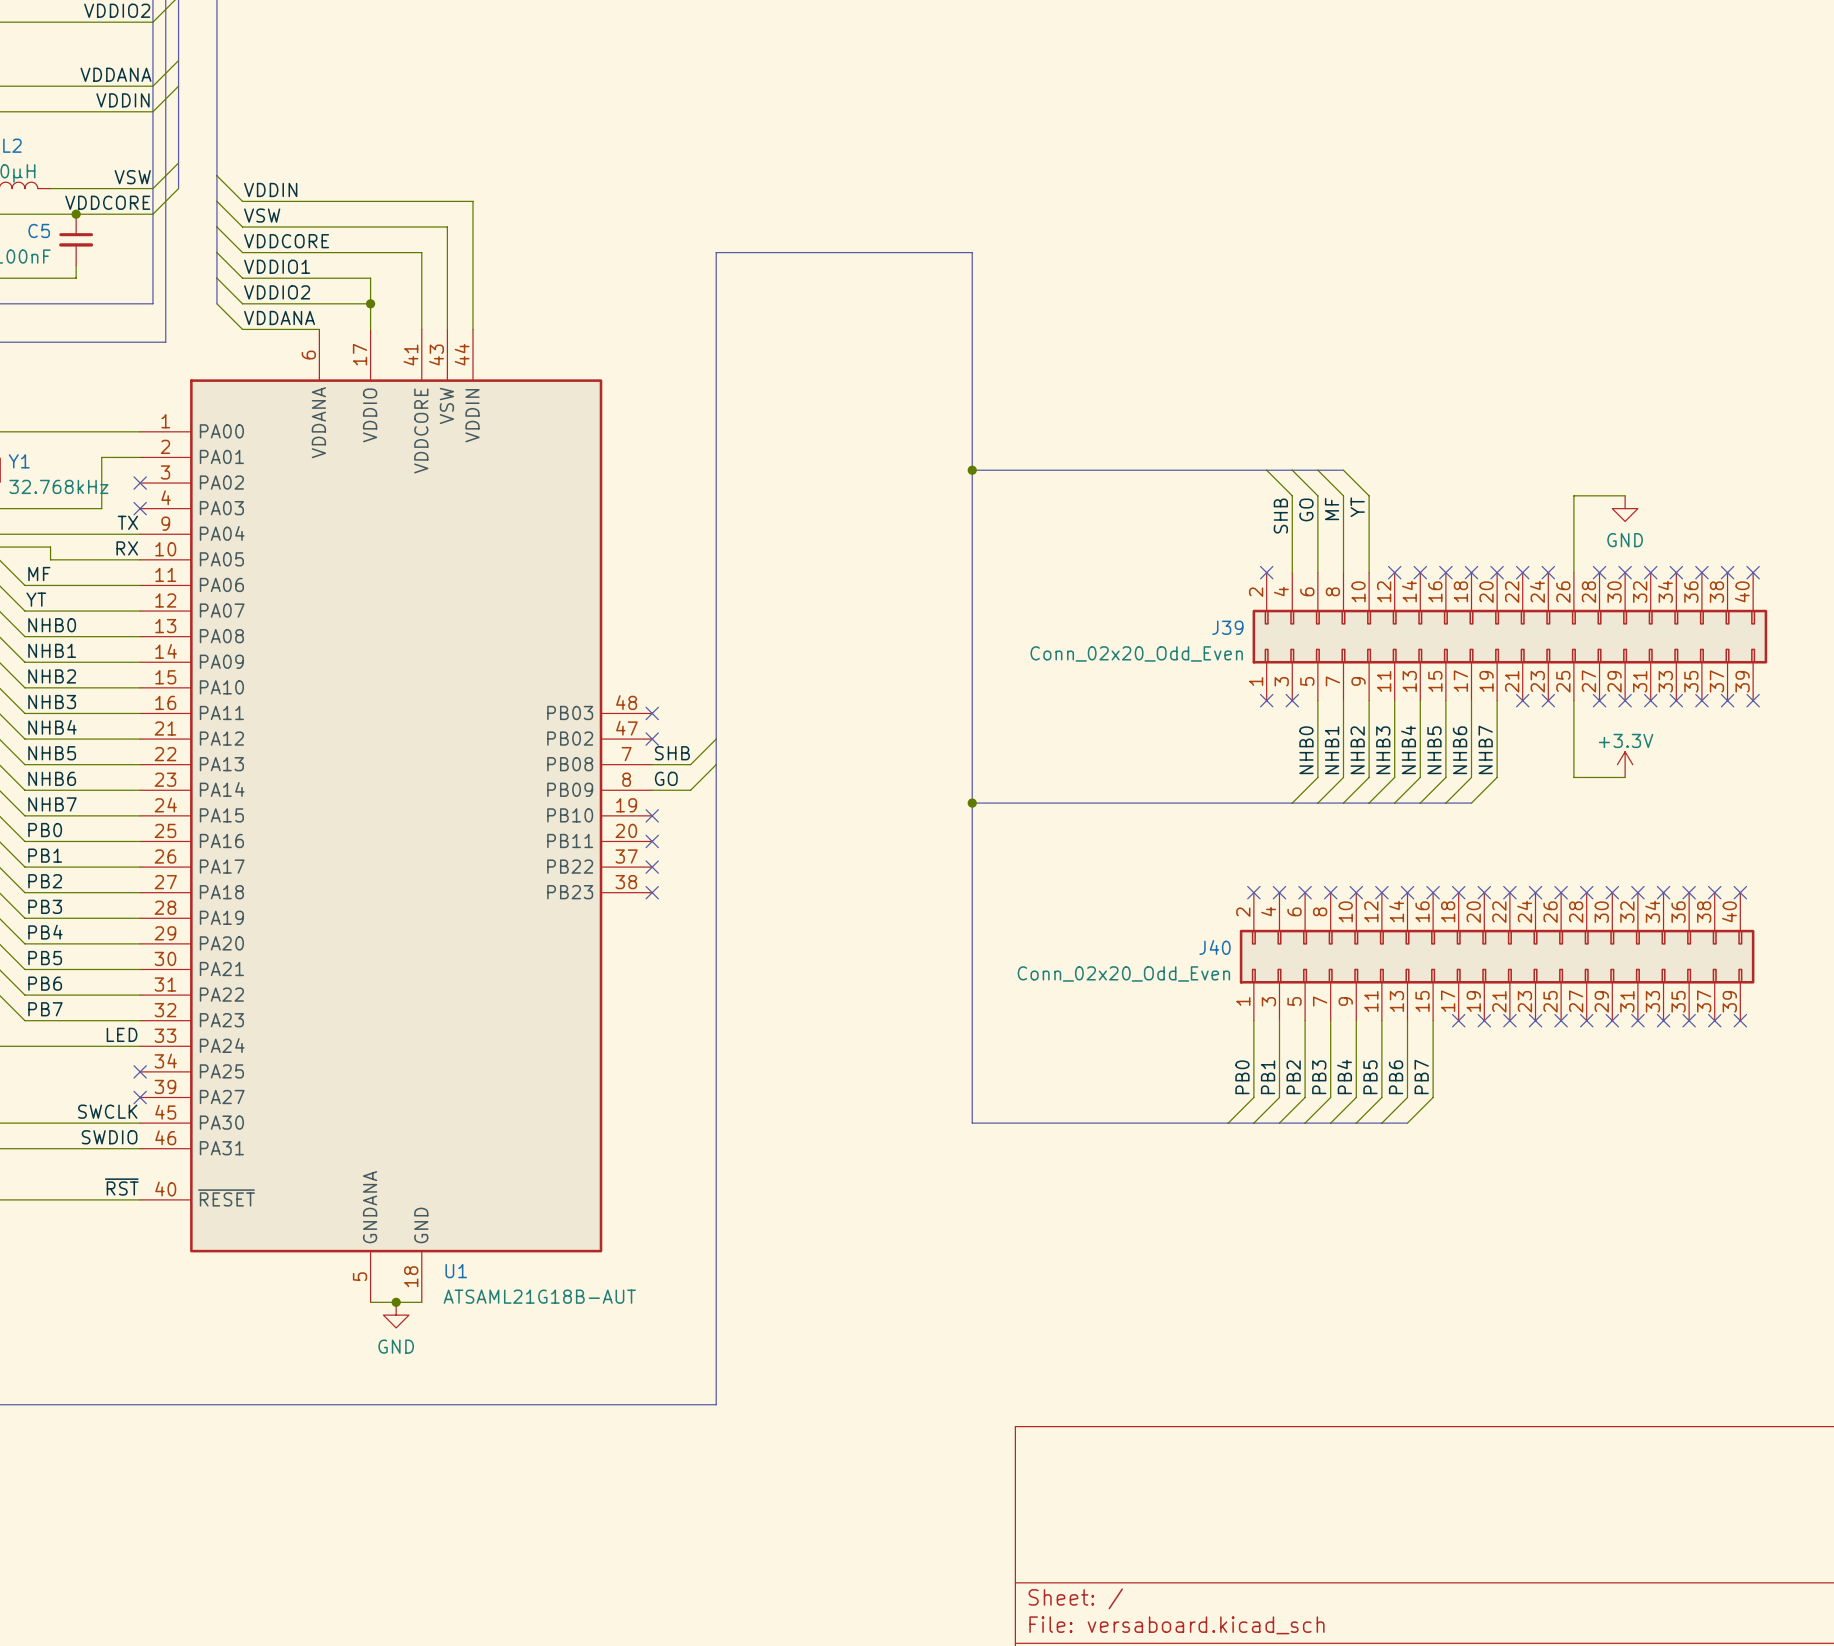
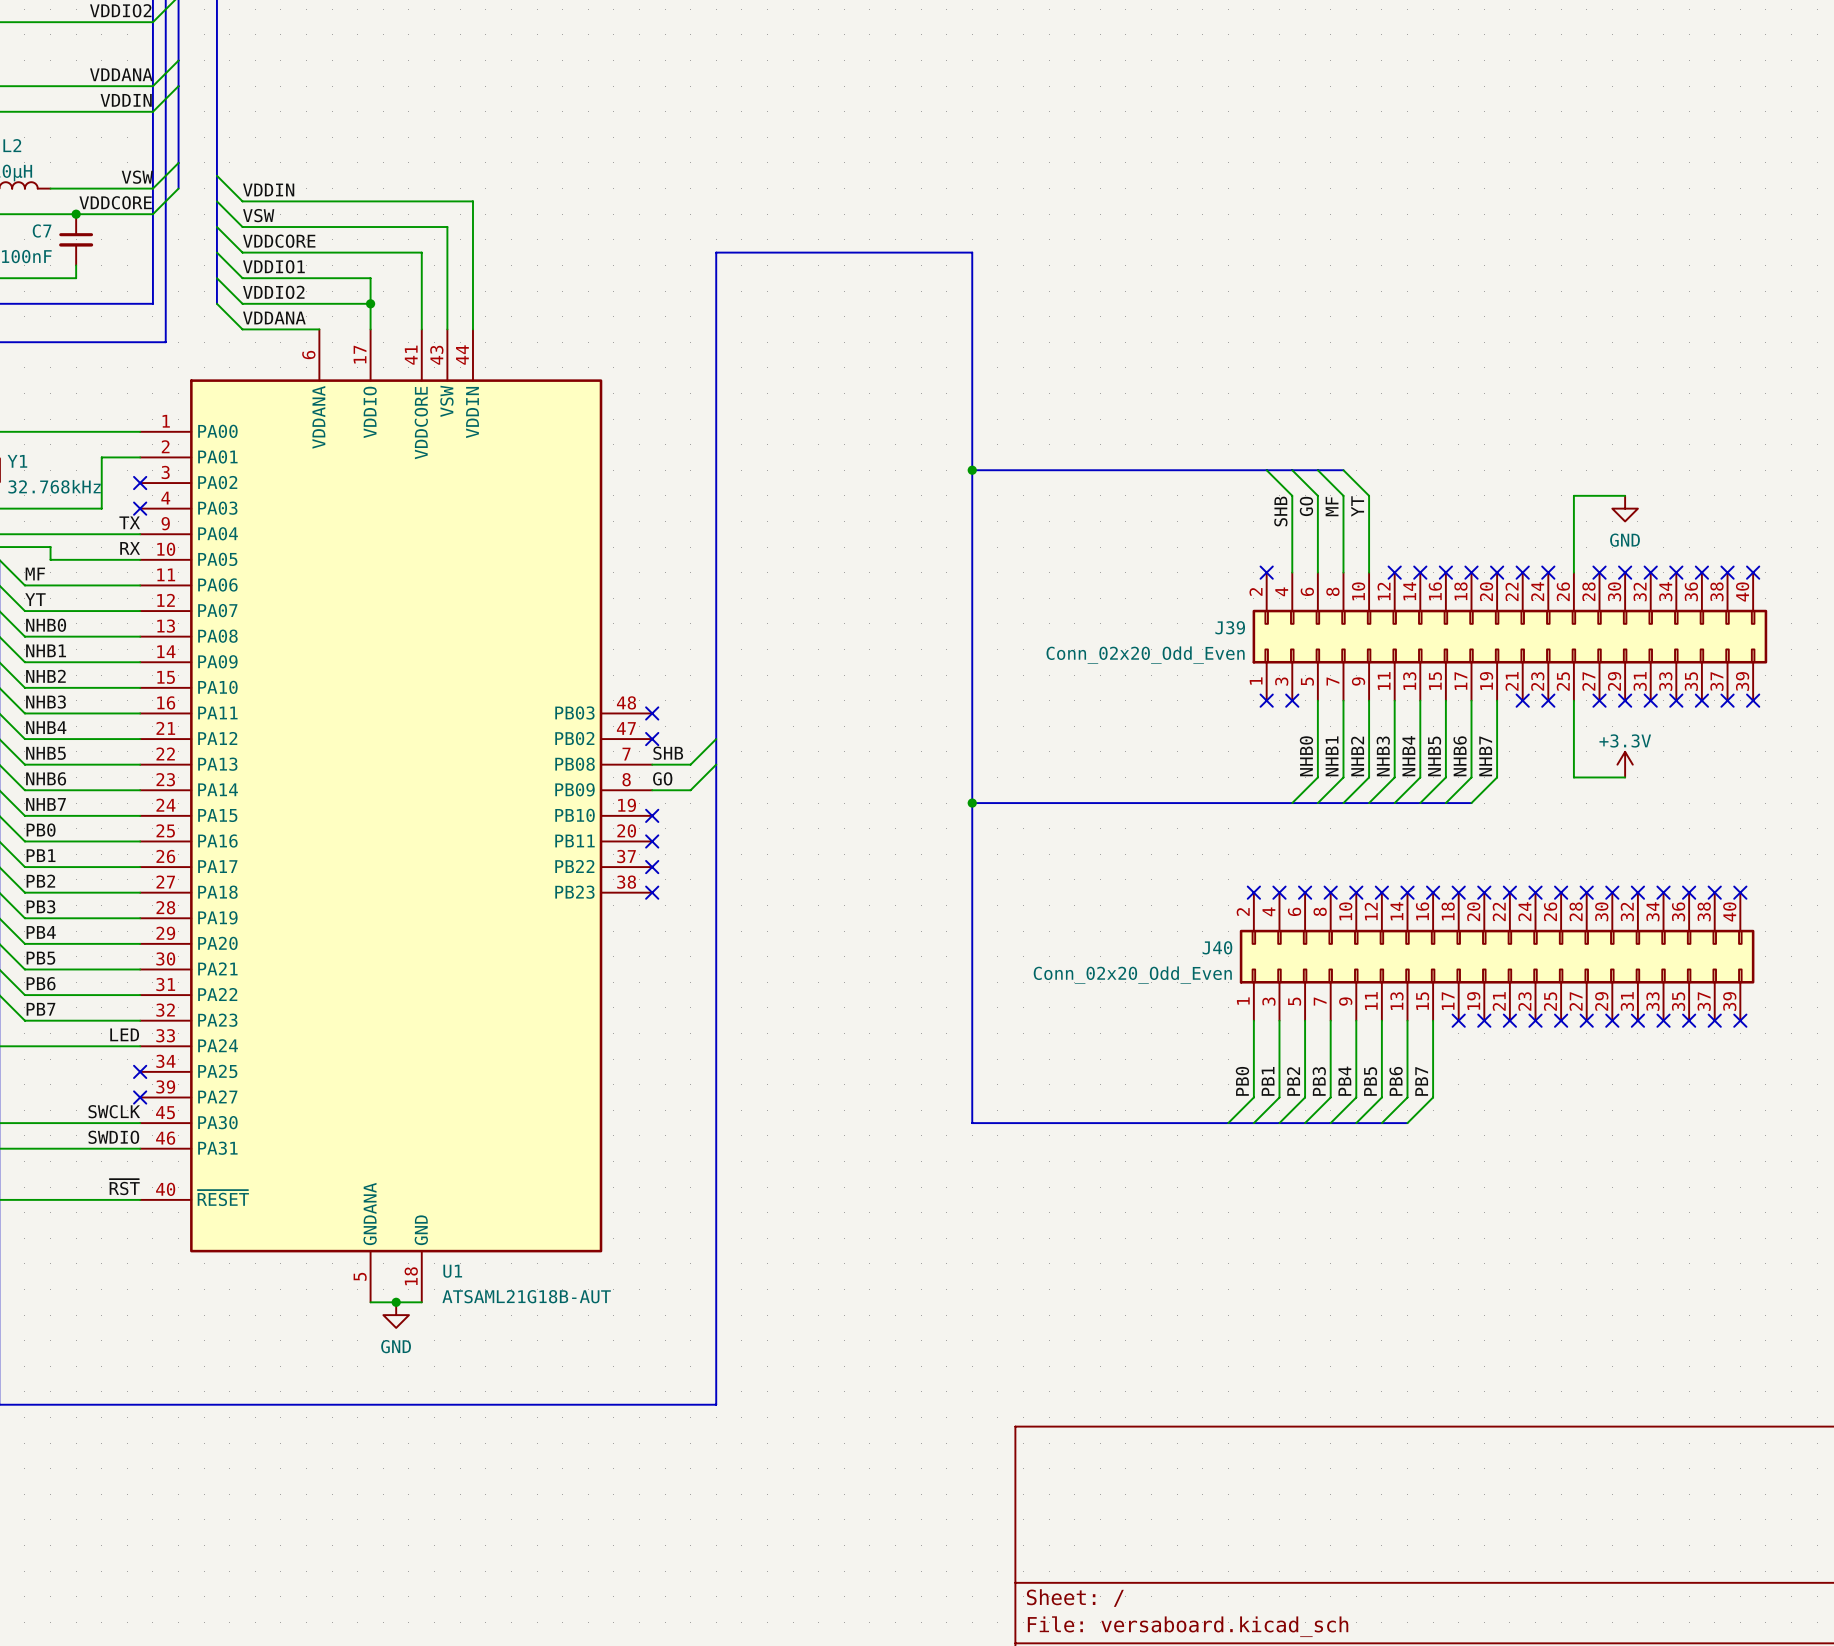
C5 name: C5 (39, 230) -> C7 (42, 230)

